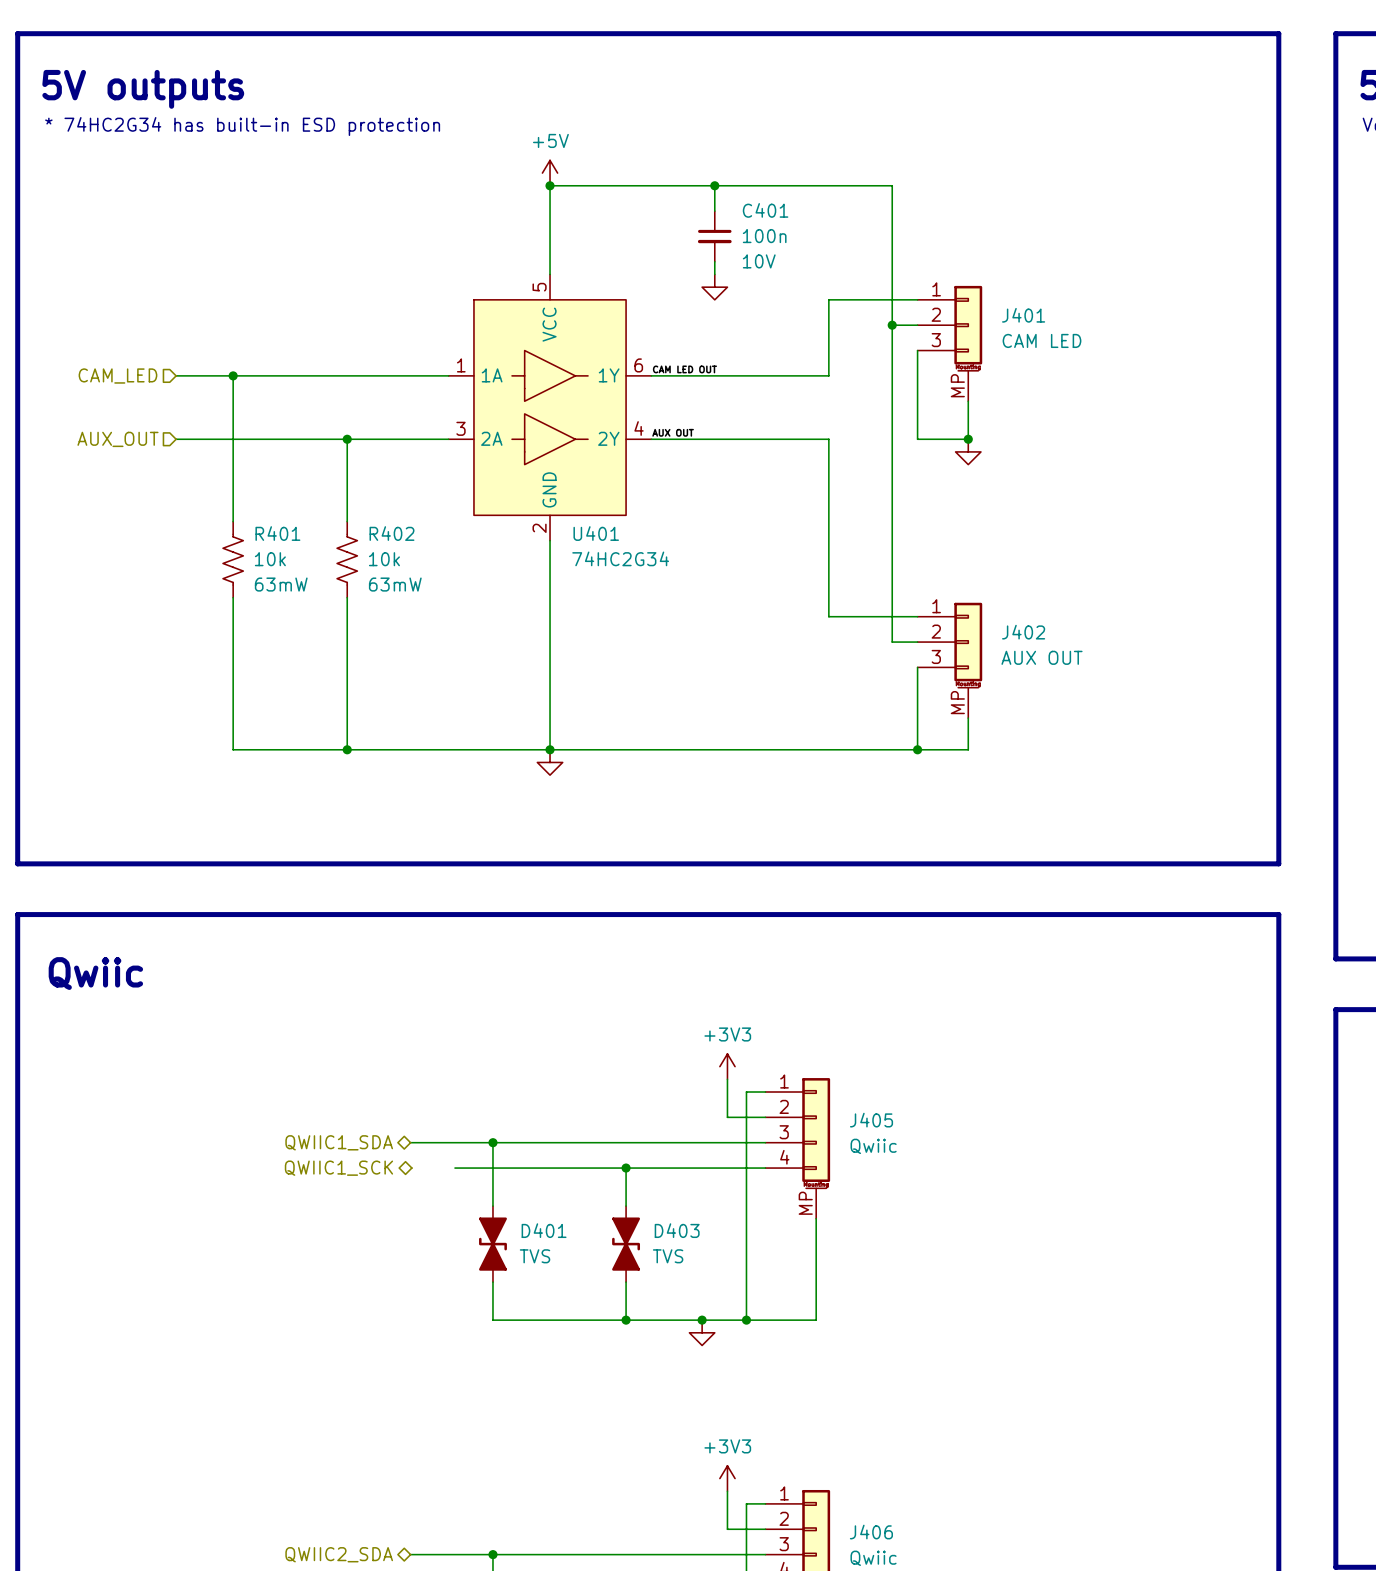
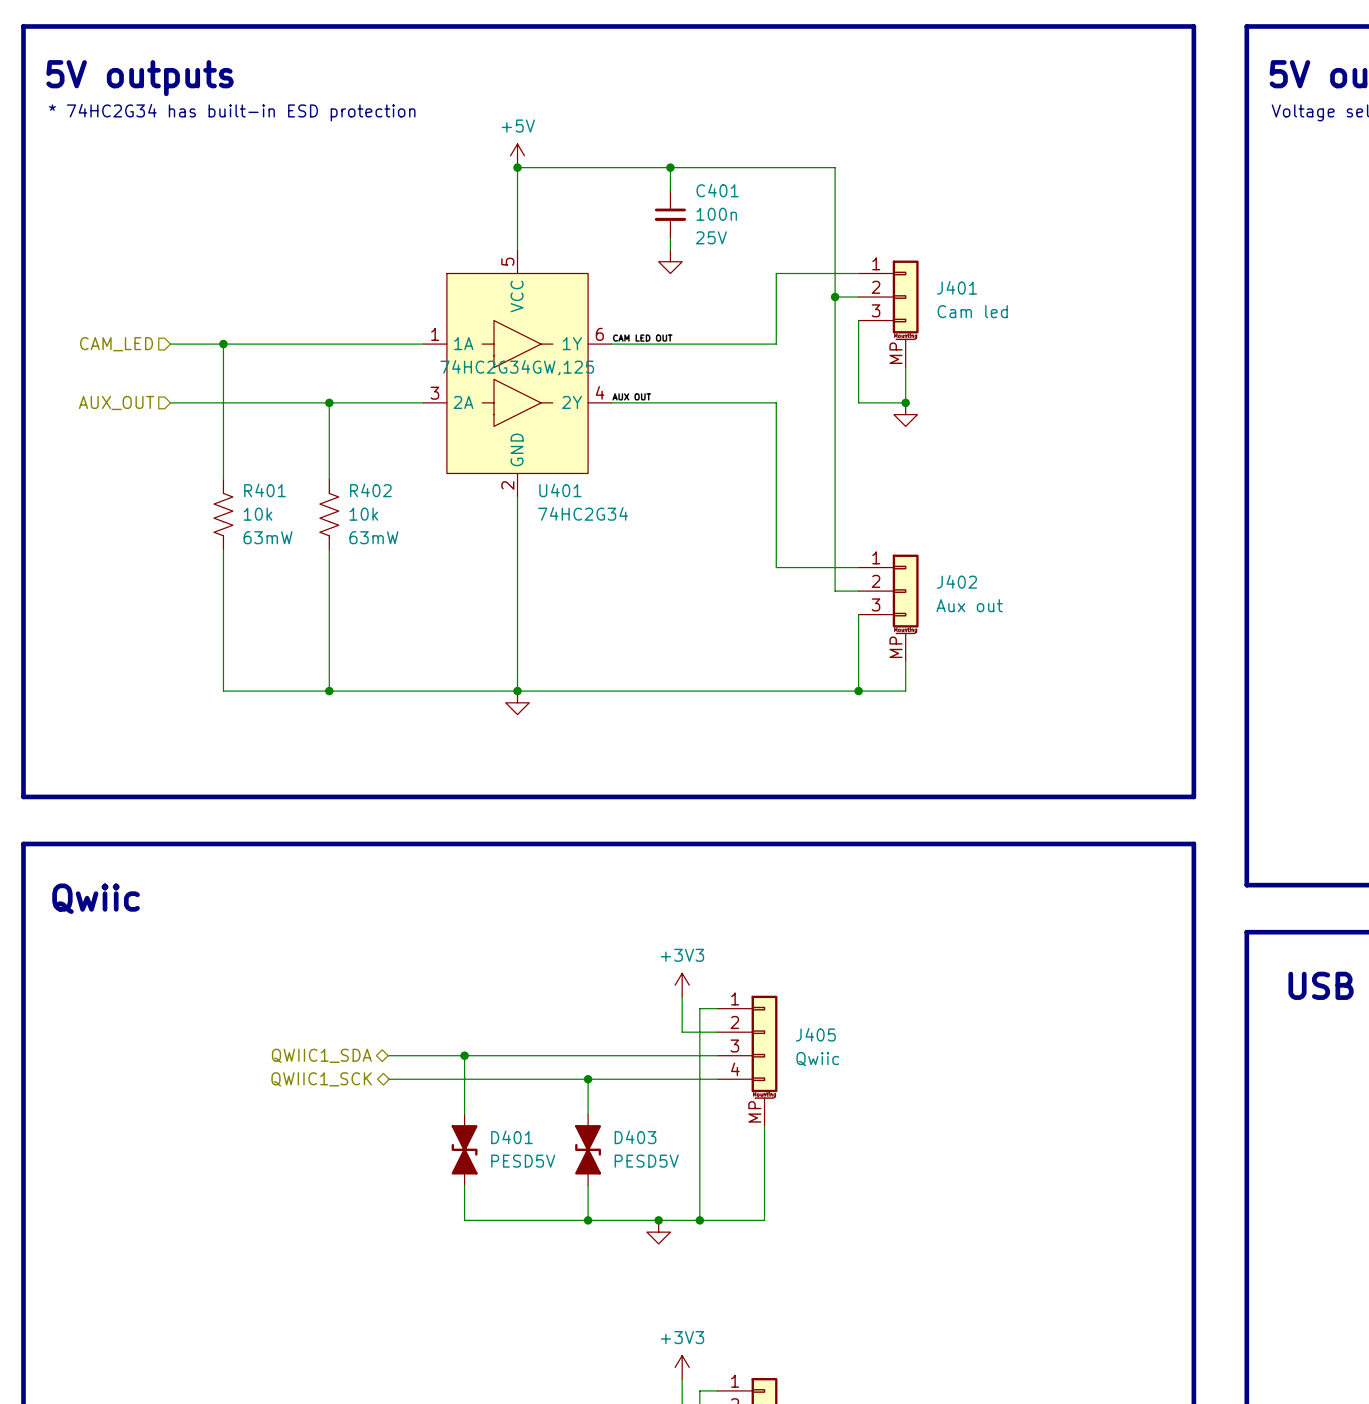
C401 text: 10V (759, 261) -> 25V (711, 237)
J401 value: CAM LED (1042, 340) -> Cam led (972, 311)
U401 text: none -> 74HC2G34GW,125 (517, 367)
J402 value: AUX OUT (1042, 657) -> Aux out (969, 605)
wire: none -> (388, 1079) (429, 1079)
D401 value: TVS (535, 1256) -> PESD5V (523, 1161)
D403 value: TVS (668, 1256) -> PESD5V (646, 1161)

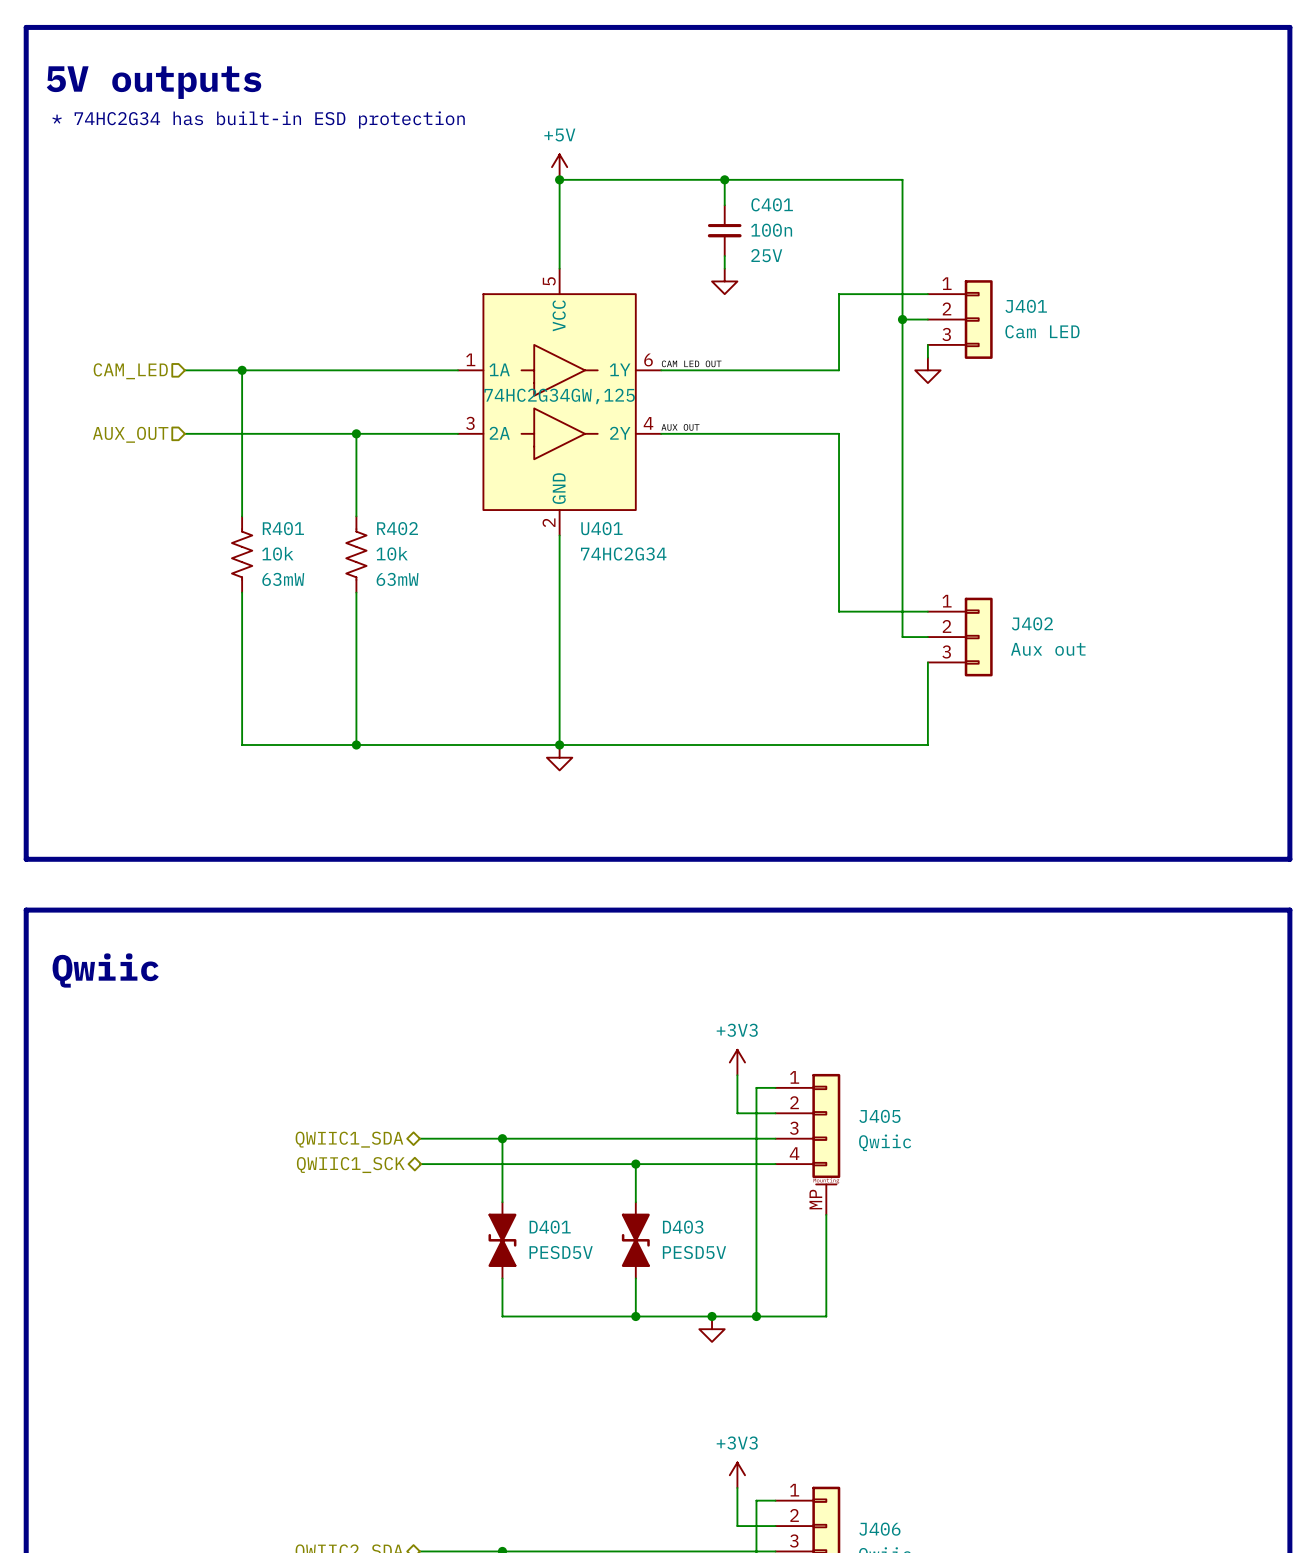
J401 symbol: [858, 260, 919, 368] -> [927, 280, 993, 359]
J401 value: Cam led (972, 311) -> Cam LED (1042, 331)
wire: (858, 332) (858, 402) (905, 402) (905, 367) -> none
junction: (905, 402) -> none
power symbol position: (905, 414) -> (927, 370)
J402 symbol: [858, 554, 919, 662] -> [927, 597, 993, 677]
wire: (905, 661) (905, 691) (858, 691) -> none
junction: (858, 691) -> none

